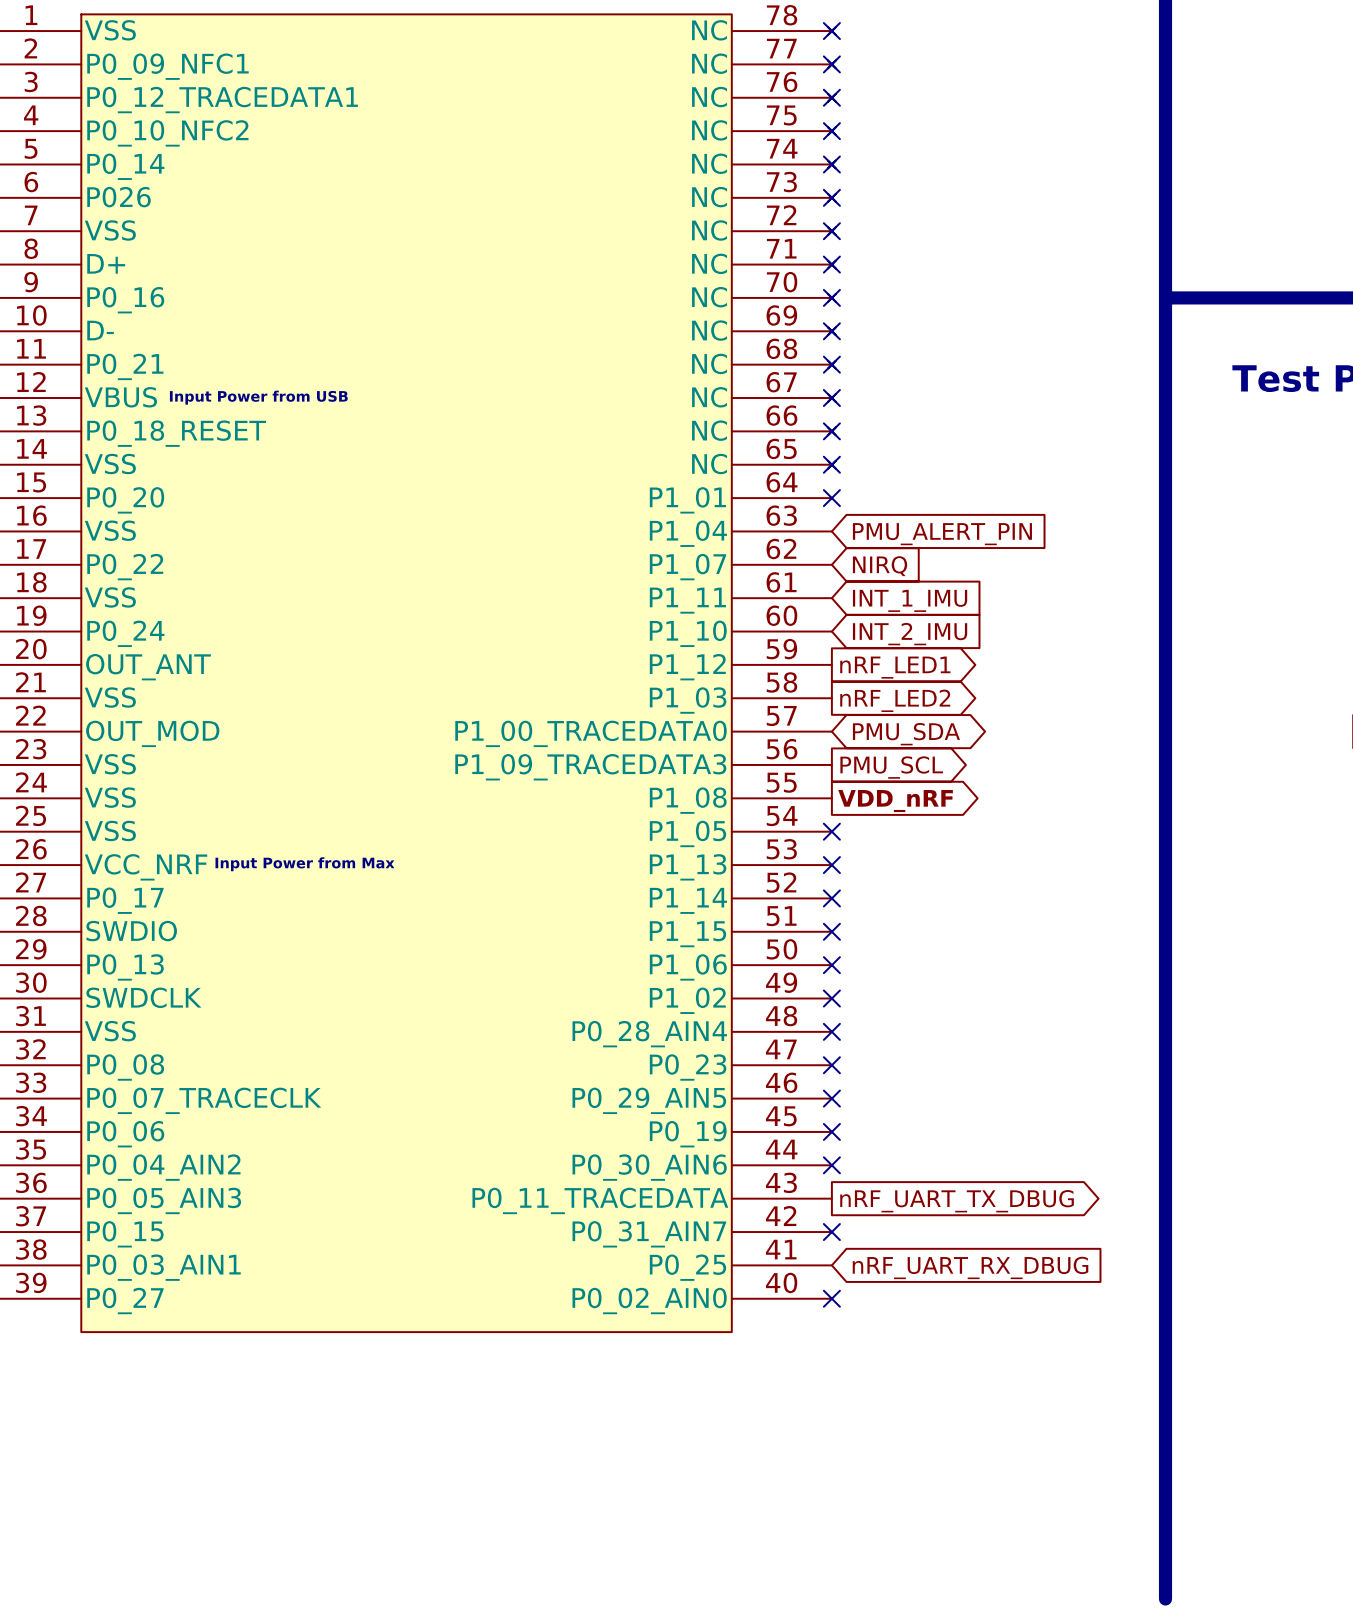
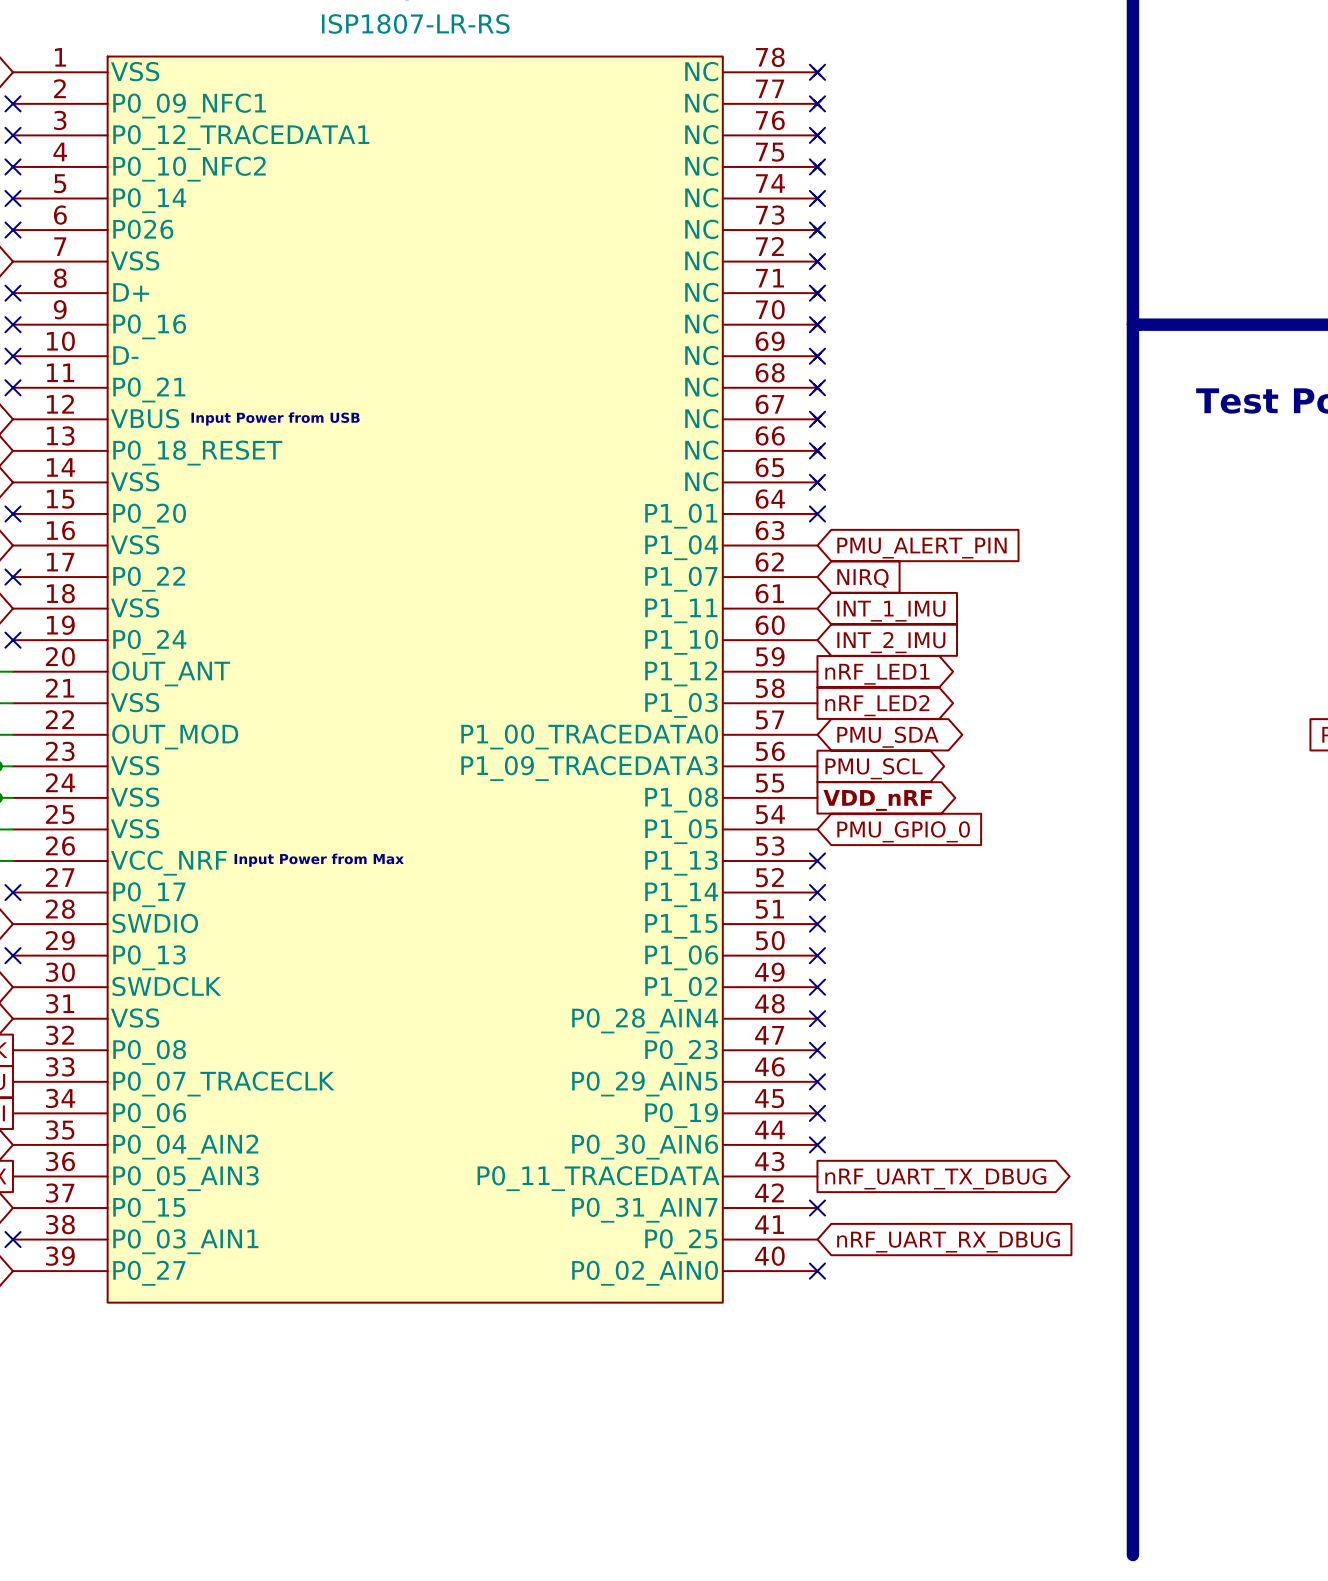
no-connect mark: (831, 831) -> none
global label: none -> PMU_GPIO_0 (903, 831)

